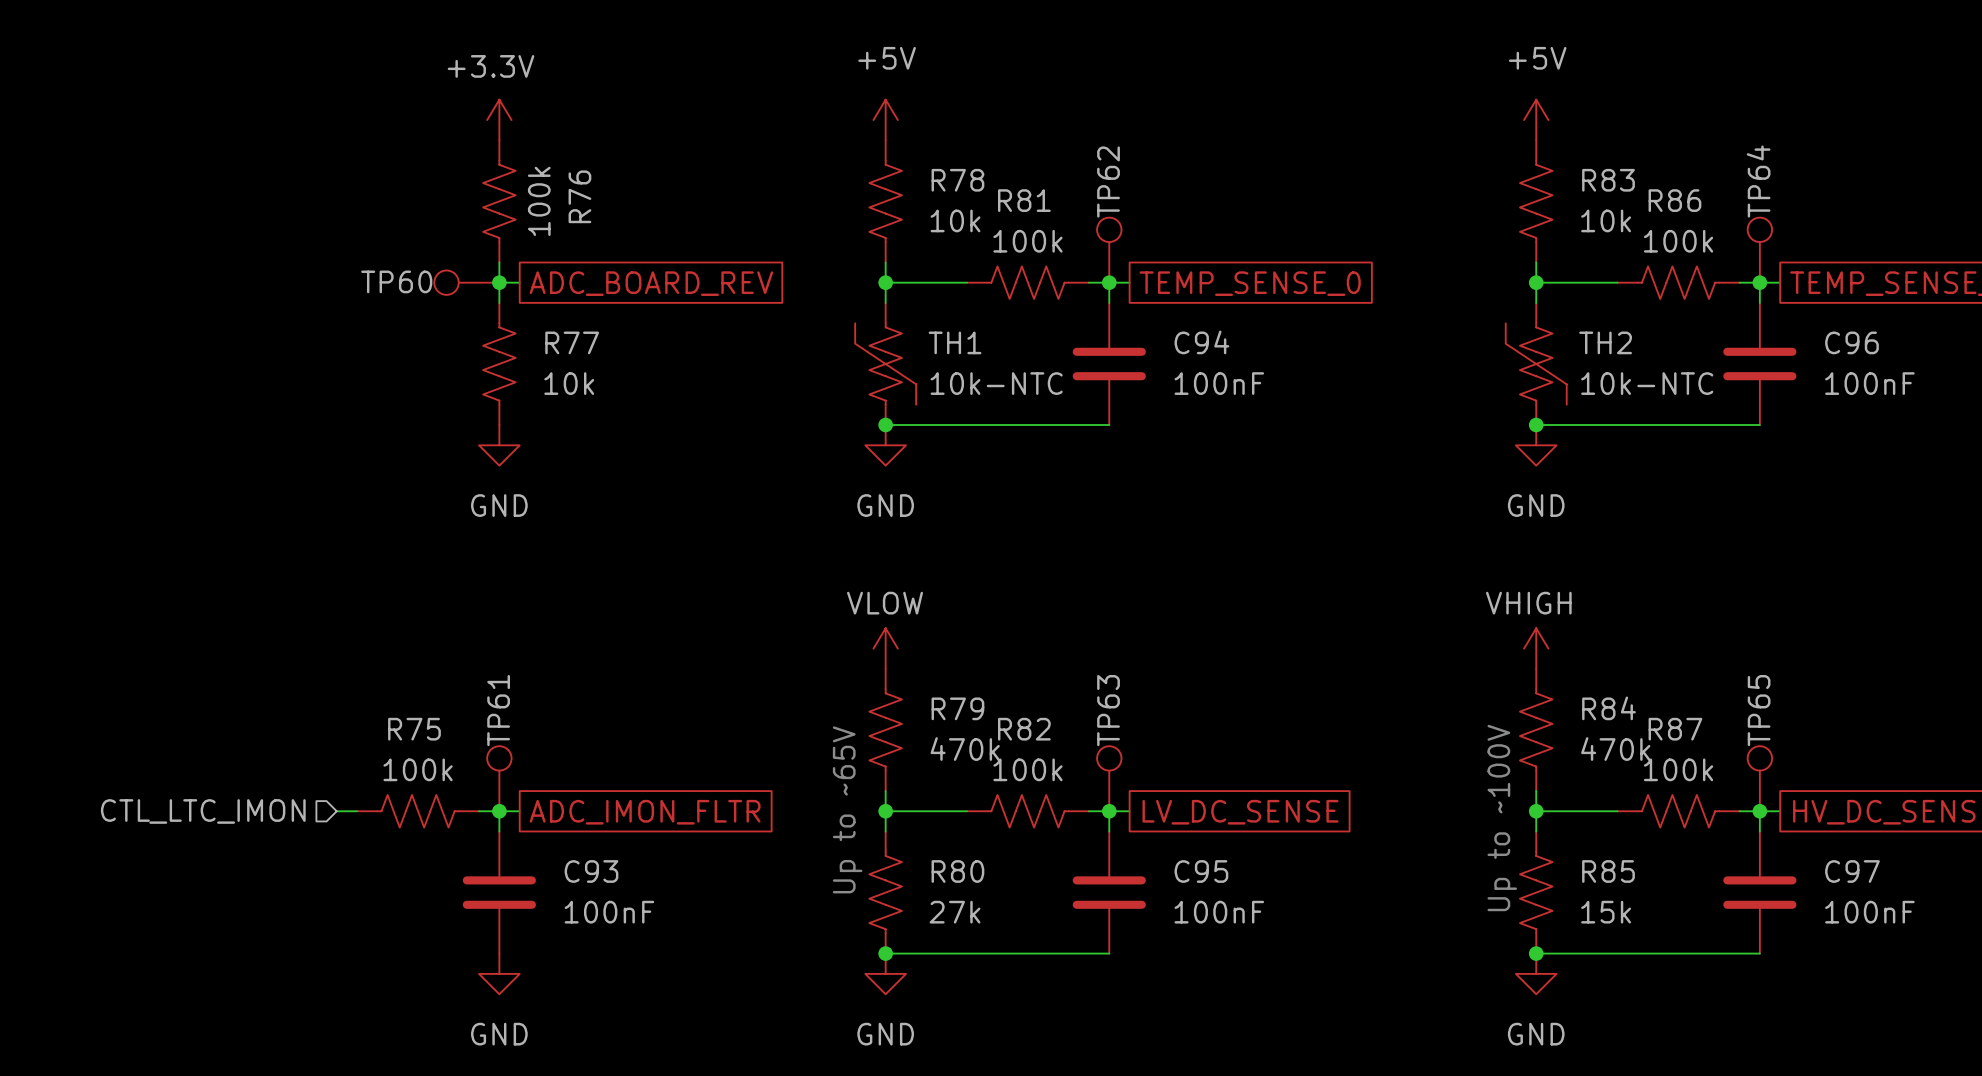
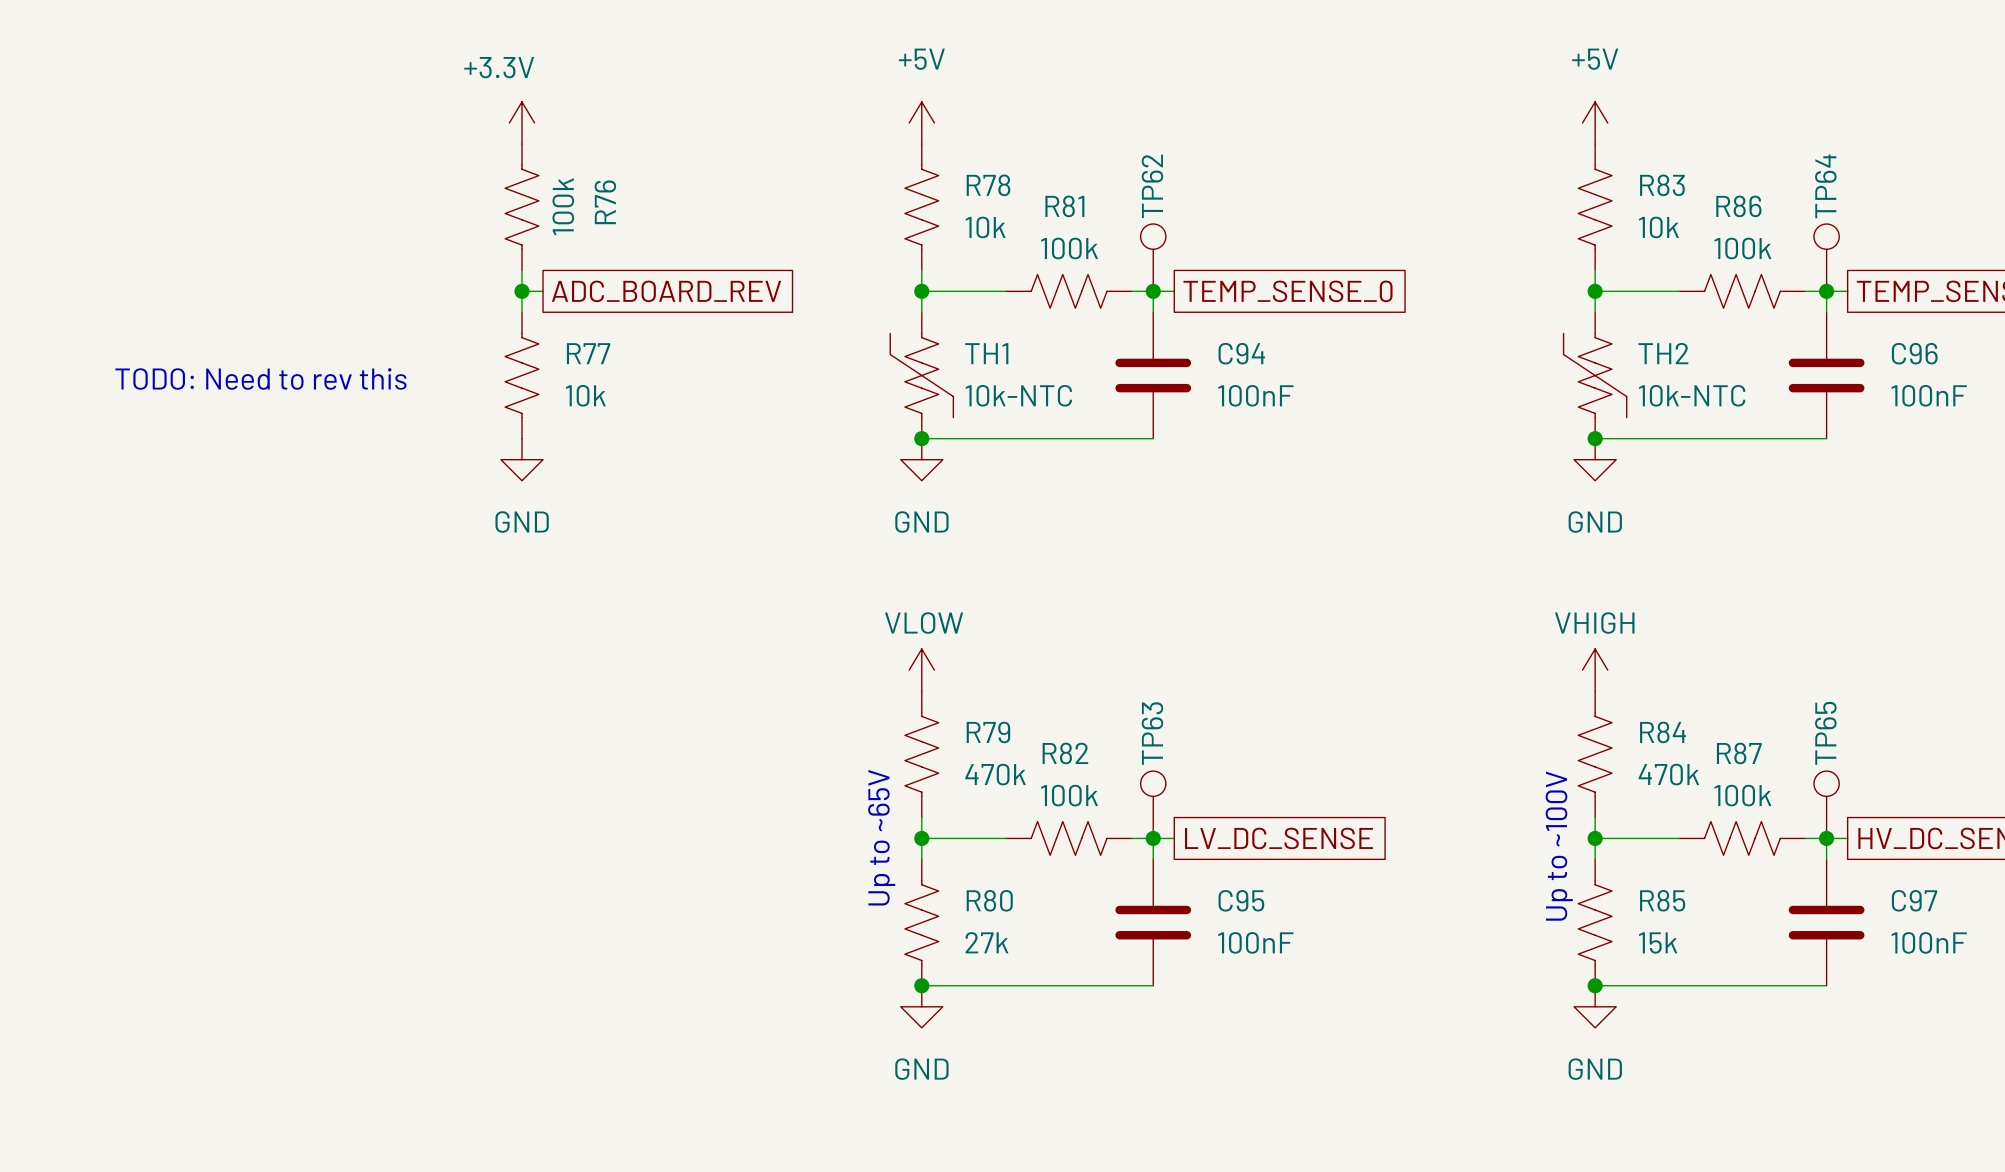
TP60: (466, 282) -> none
text: none -> TODO: Need to rev this (260, 378)
TP61: (499, 778) -> none
hierarchical label: CTL_LTC_IMON (203, 811) -> none
wire: (336, 811) (357, 811) -> none
R75: 100k (418, 811) -> none
wire: (479, 811) (519, 811) -> none
wire: (499, 811) (499, 831) -> none
junction: (499, 811) -> none
global label: ADC_IMON_FLTR (645, 812) -> none
C93: 100nF (499, 892) -> none
power symbol: GND (499, 973) -> none

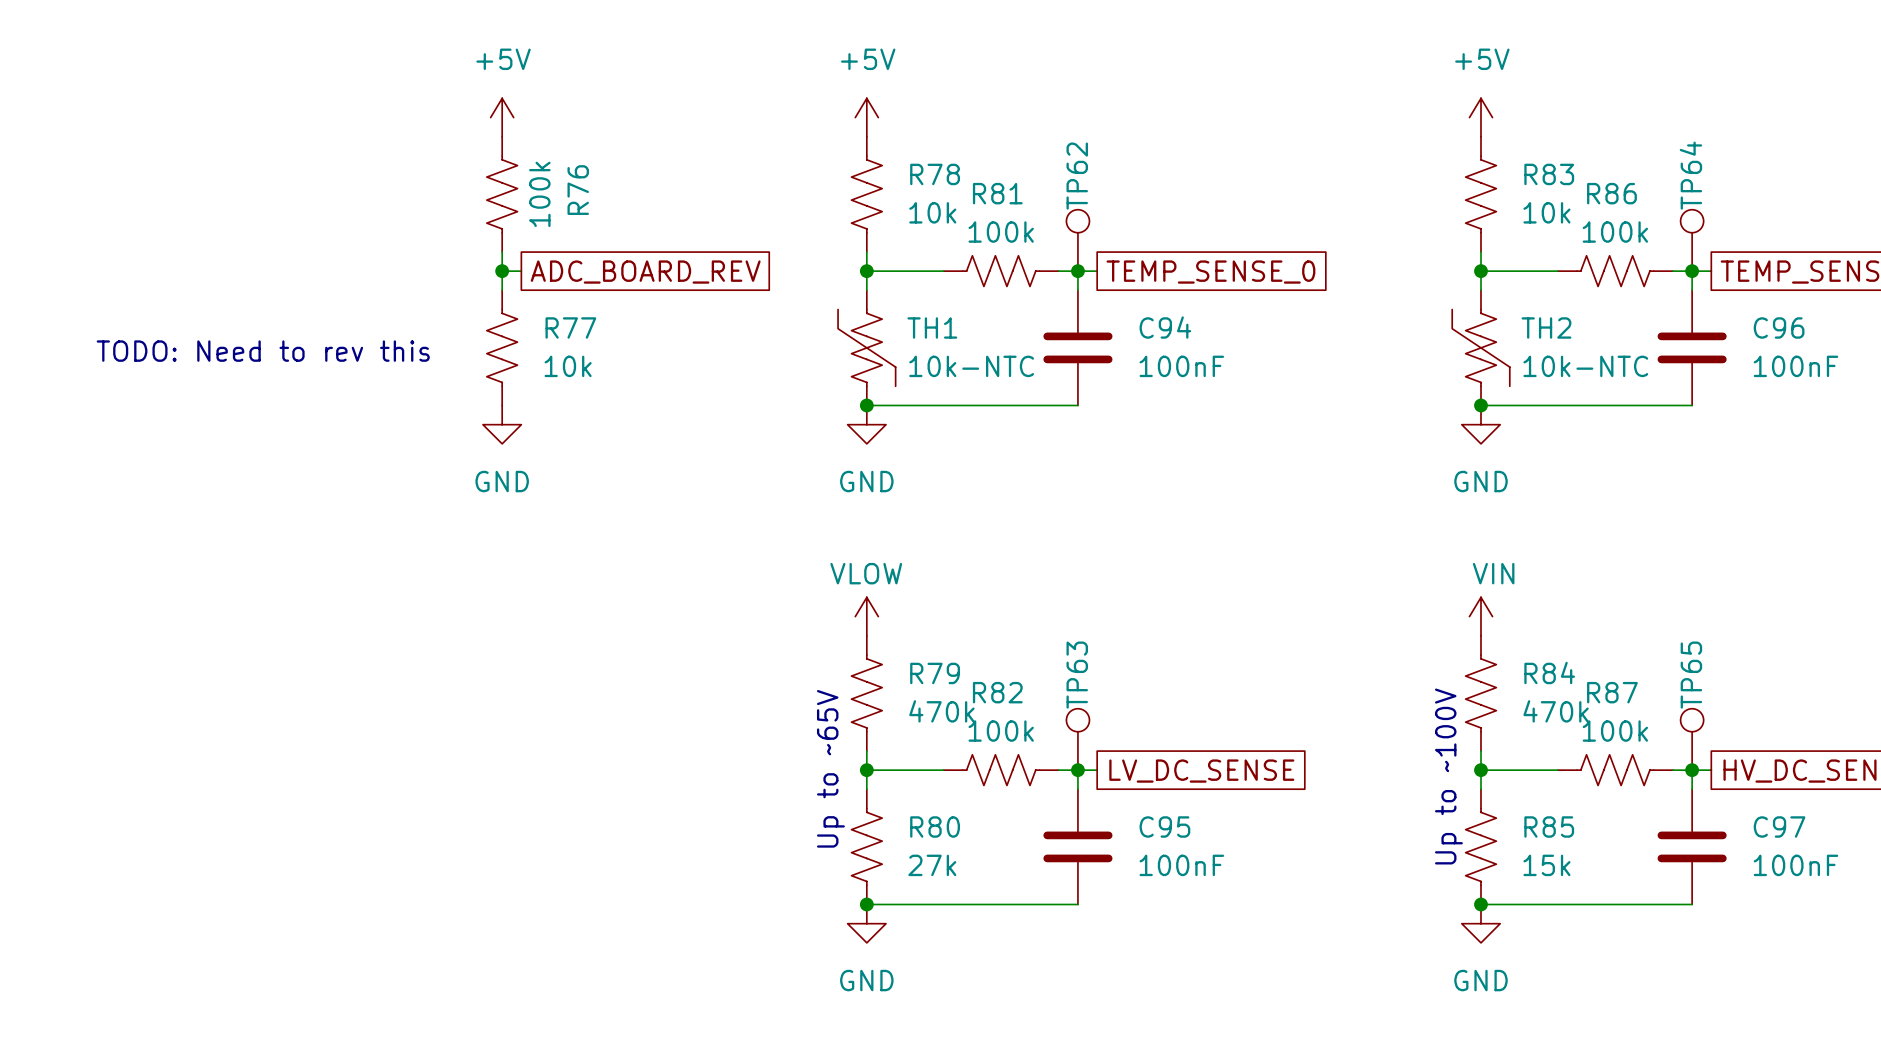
power symbol: +3.3V (521, 123) -> +5V (502, 117)
power symbol: VHIGH (1595, 670) -> VIN (1481, 616)

